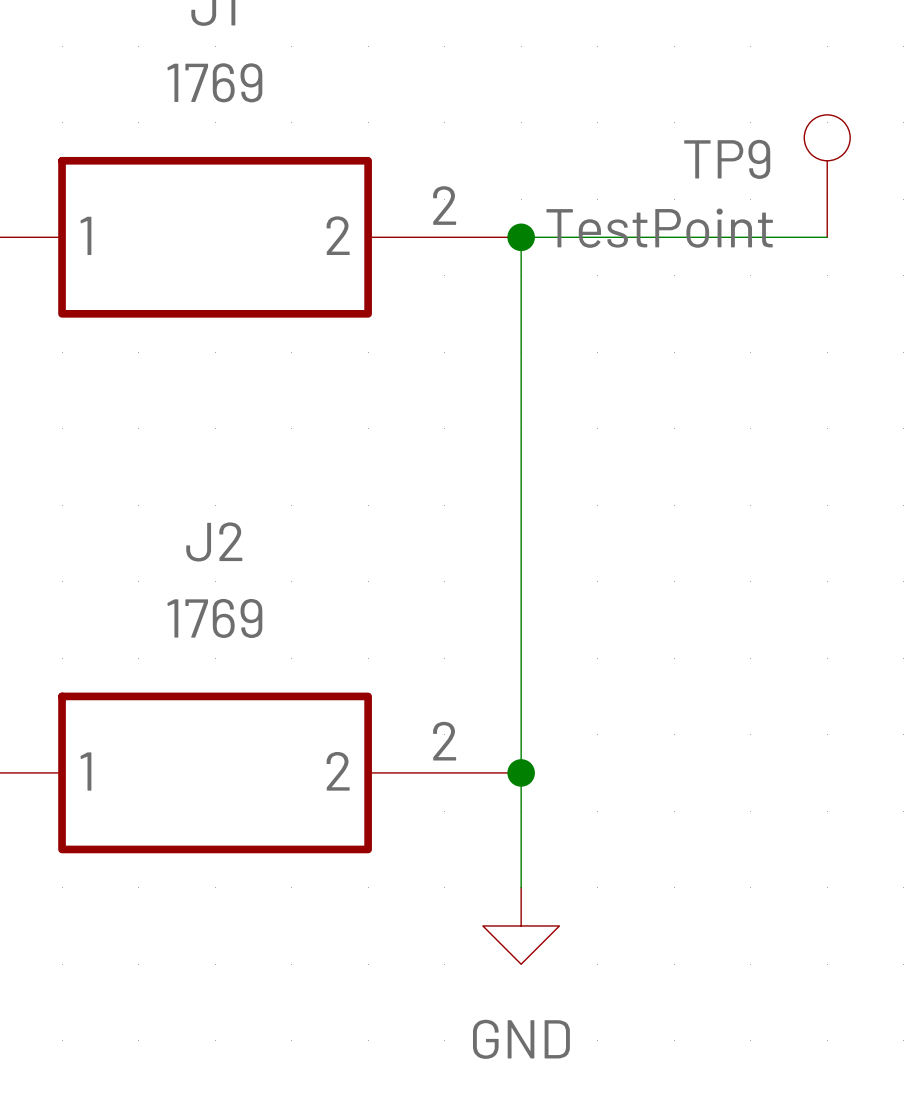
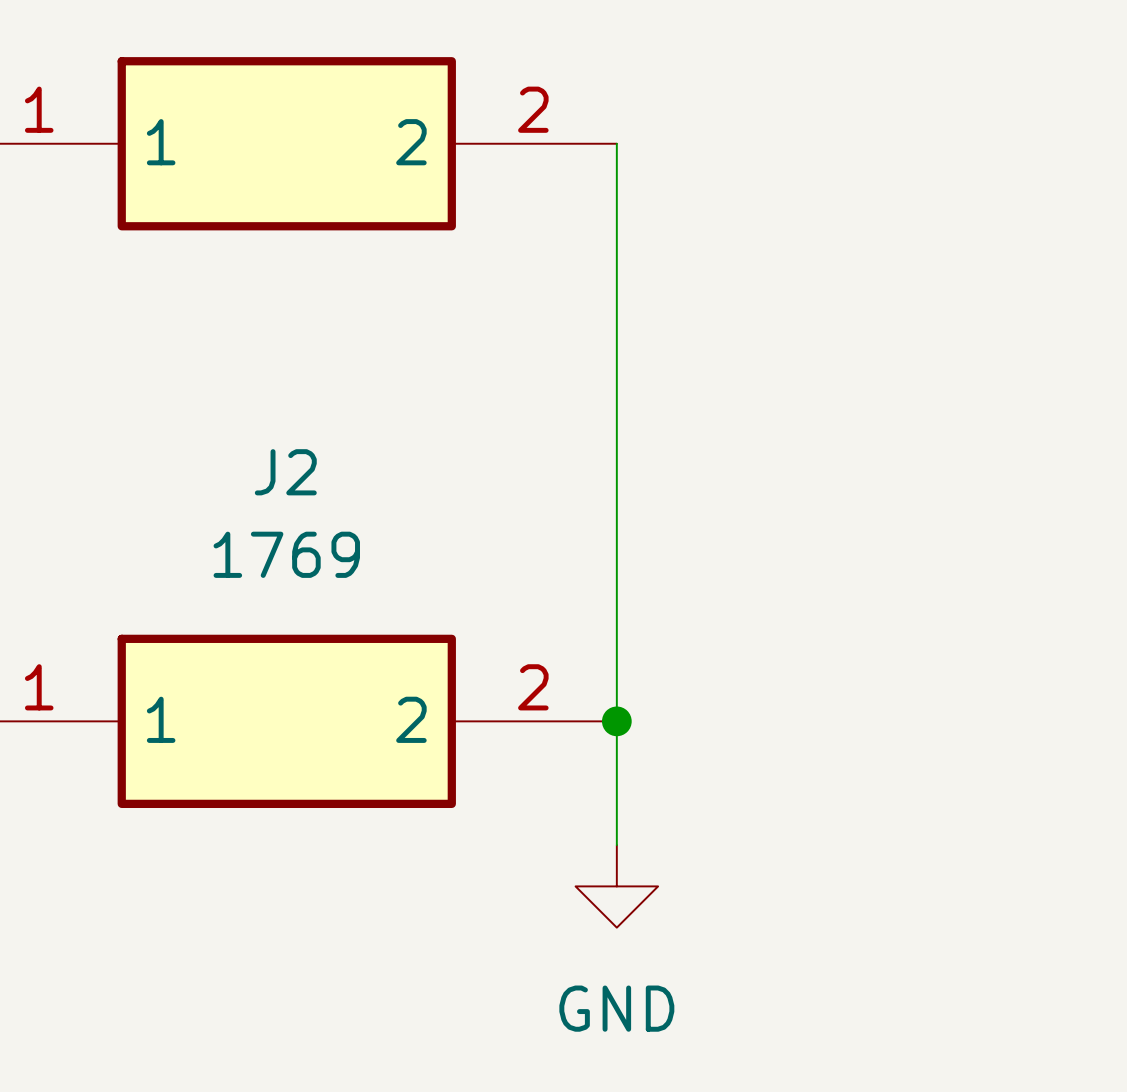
TP9: TestPoint (827, 176) -> none
wire: (521, 237) (827, 237) -> none
junction: (521, 237) -> none

